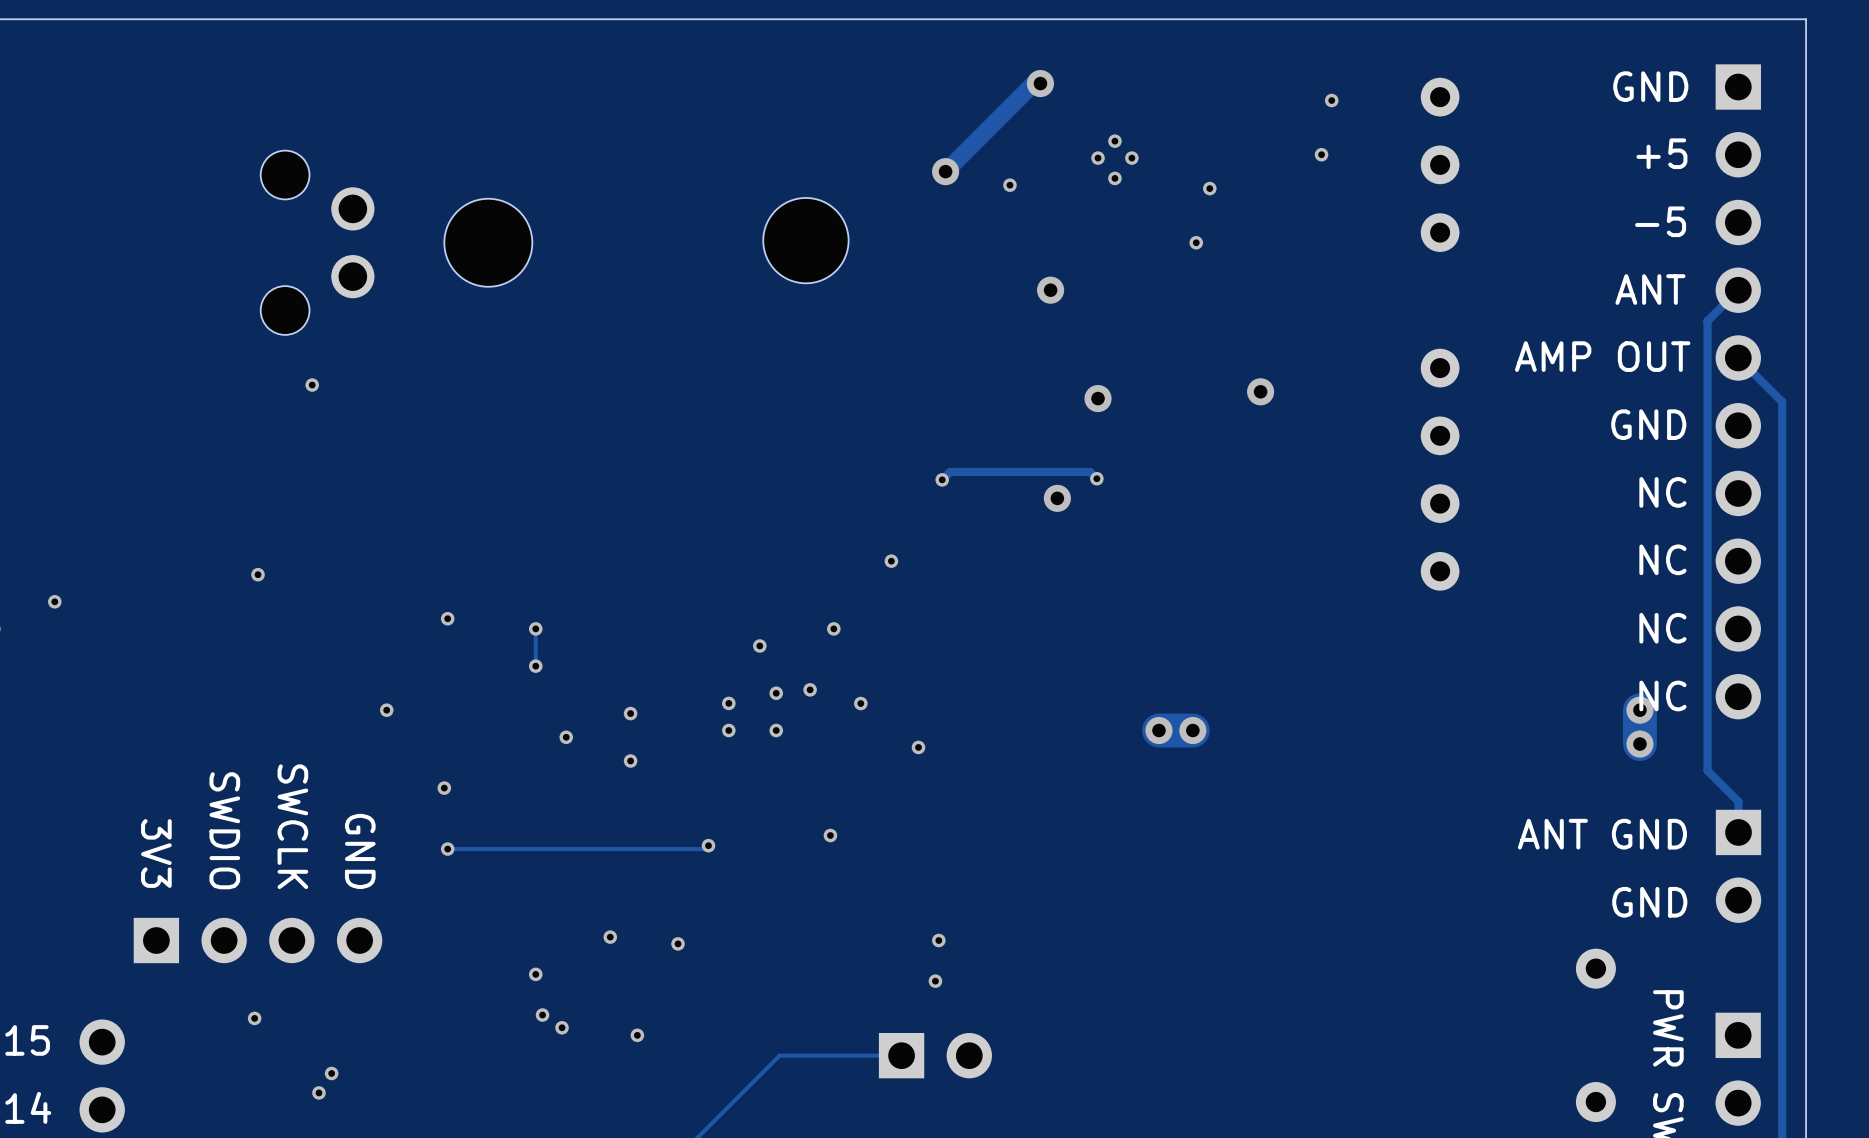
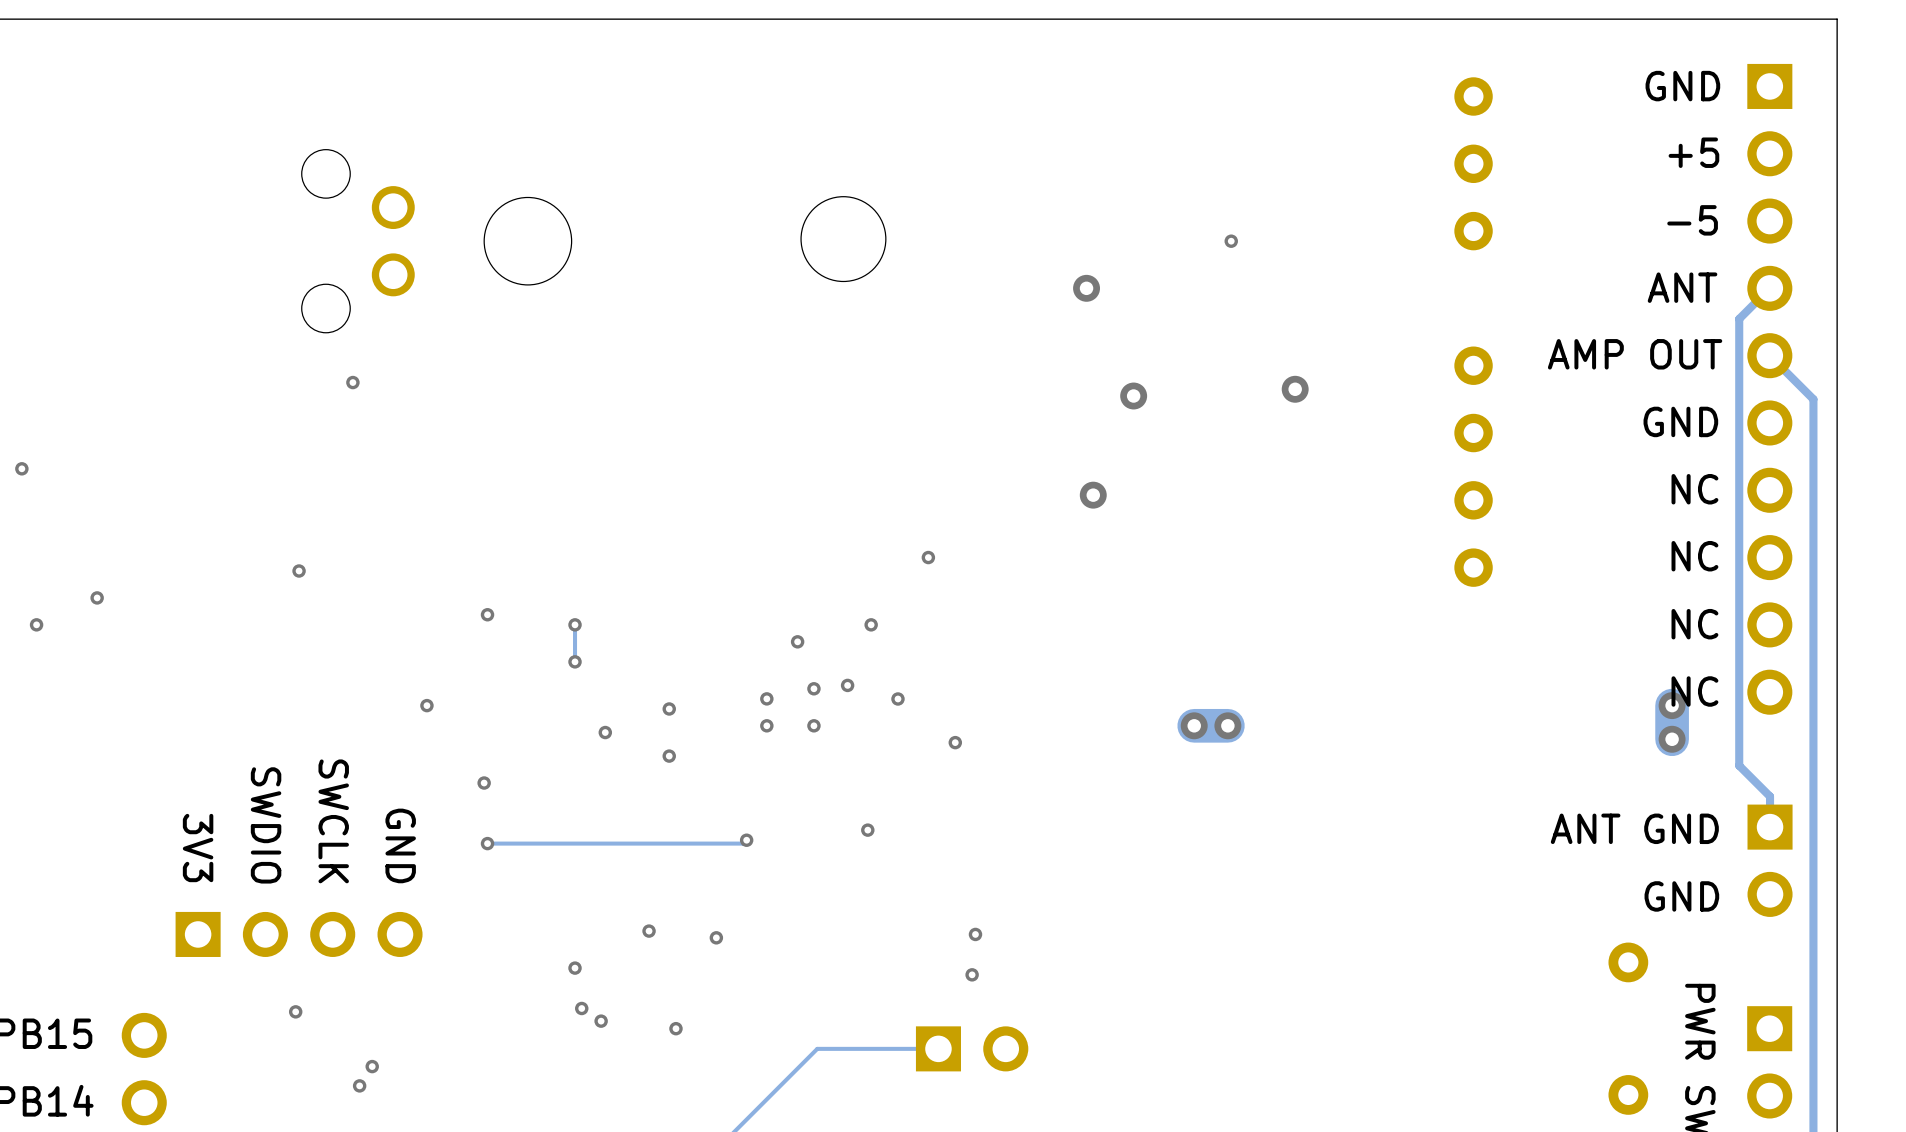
track: (1040, 83) (1033, 83) (945, 171) -> none
via: (1040, 83) -> none
via: (1331, 100) -> none
via: (1114, 141) -> none
via: (1321, 154) -> none
via: (1098, 158) -> none
via: (1131, 158) -> none
via: (945, 171) -> none
via: (1114, 178) -> none
via: (1009, 185) -> none
via: (1209, 188) -> none
track: (1096, 478) (1090, 471) (950, 471) (942, 479) -> none
via: (1096, 478) -> none
via: (942, 479) -> none

